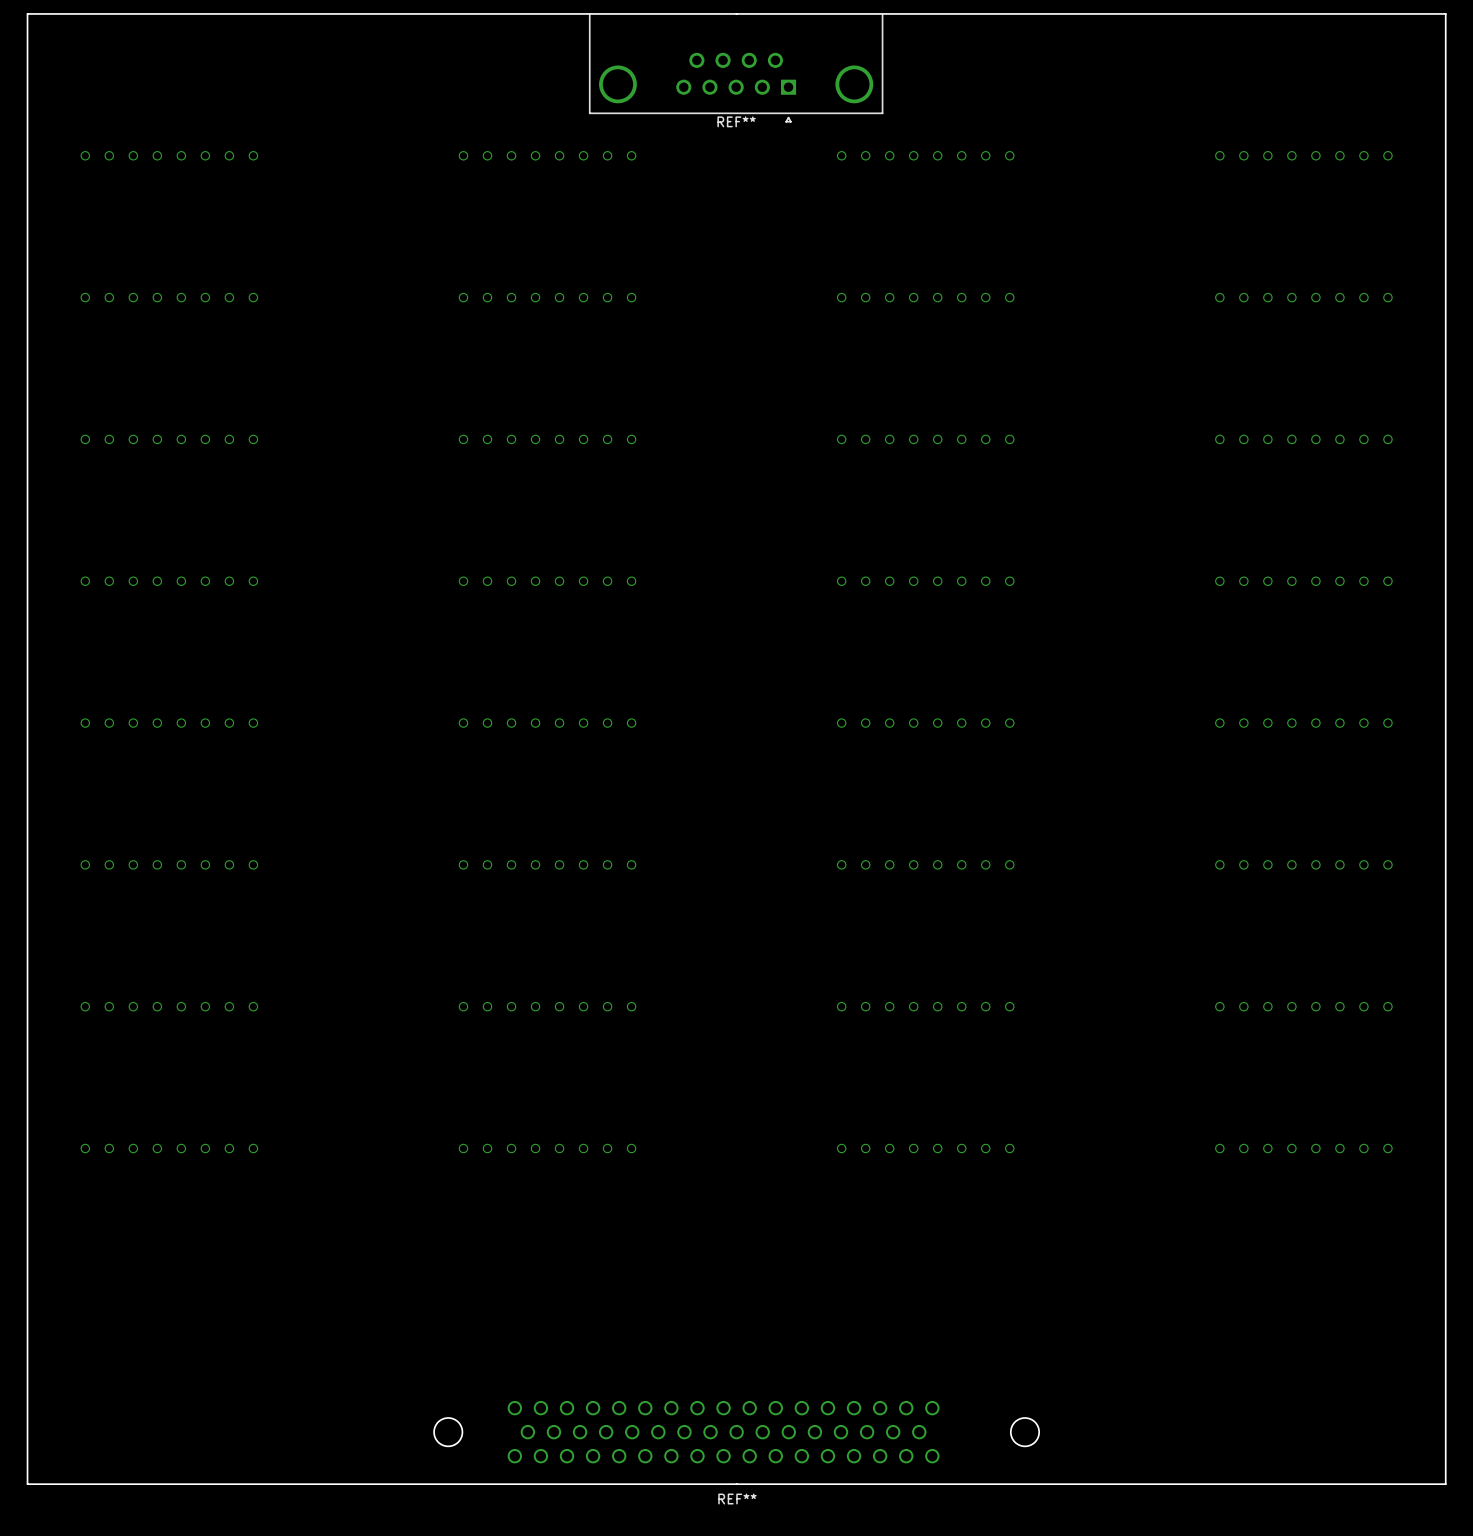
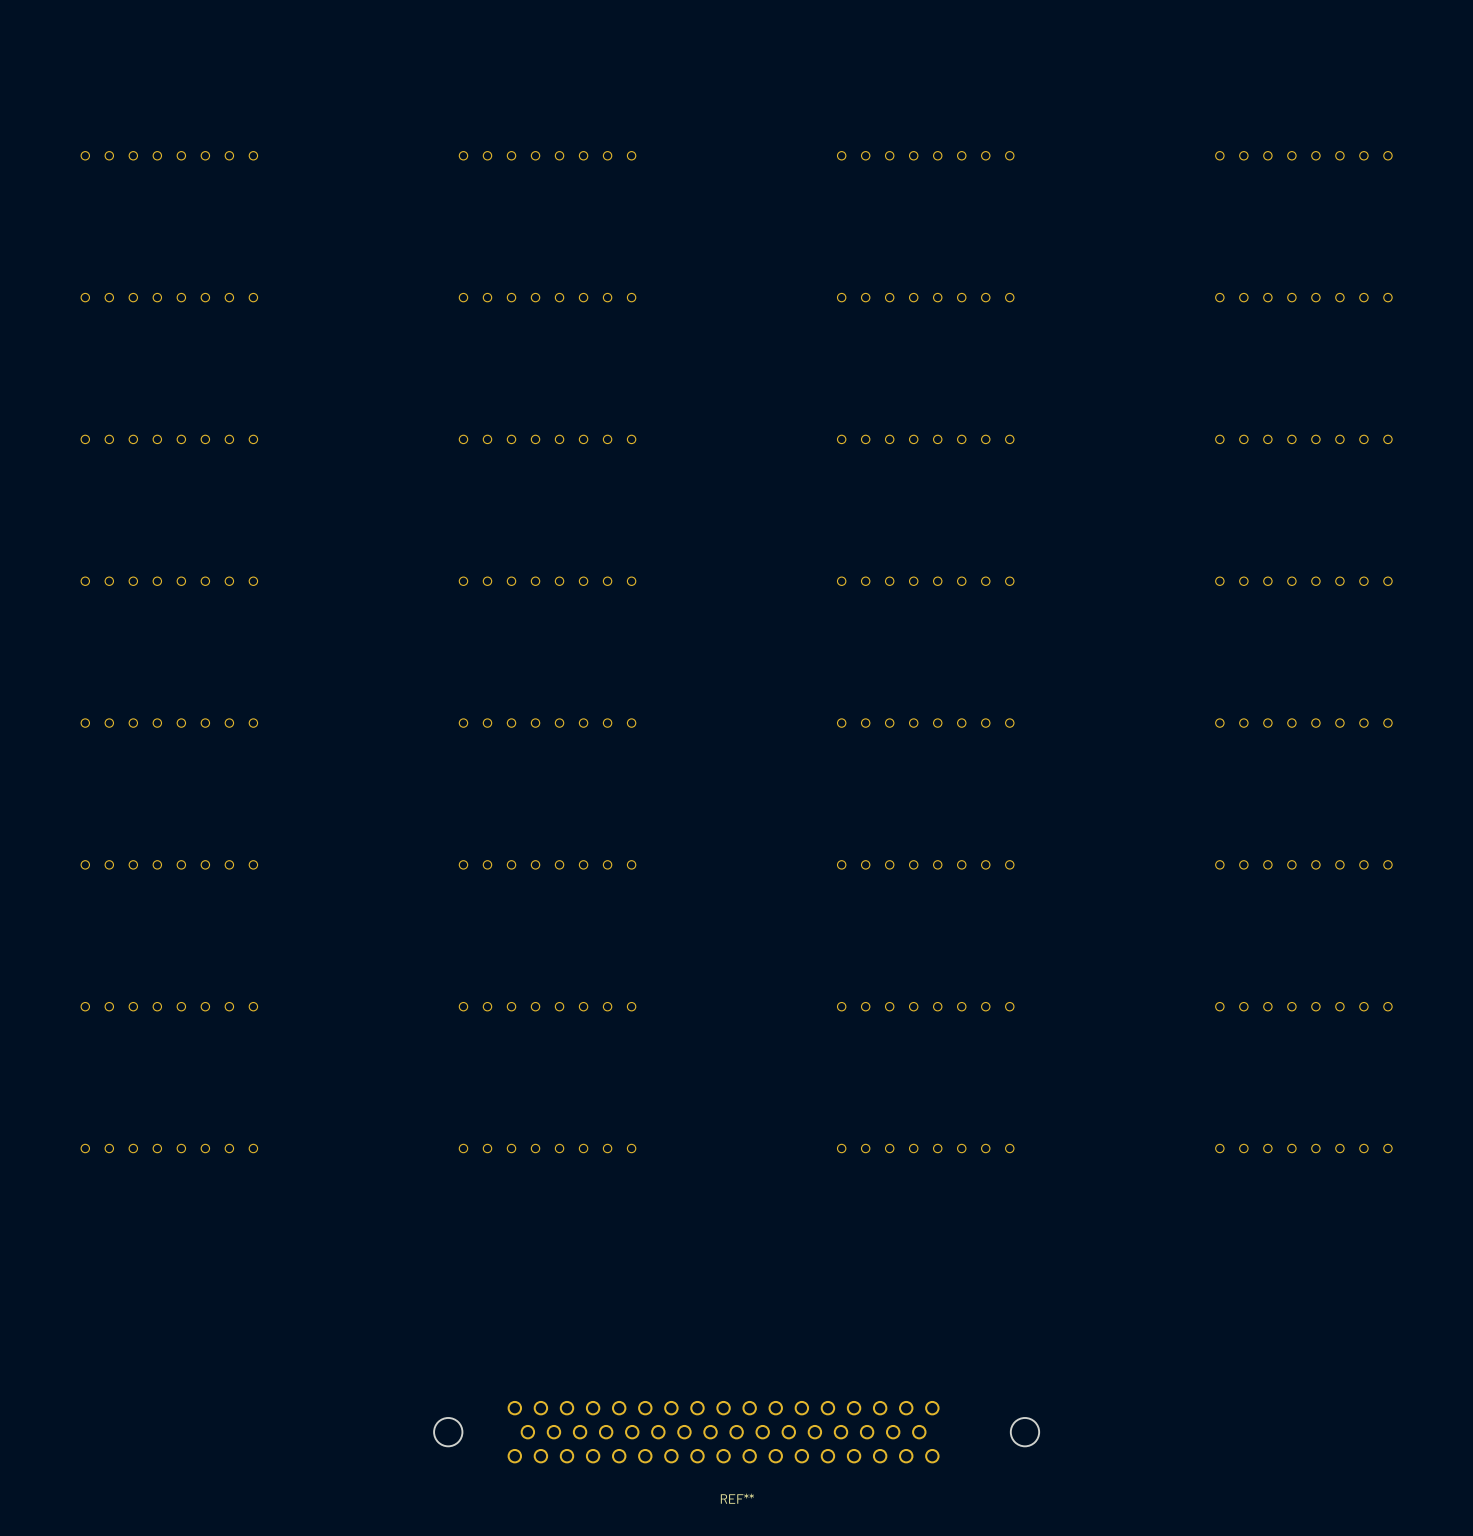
board edge: (27, 13) (1445, 13) (1445, 1484) (27, 1484) (27, 13) -> none
REF**: (736, 68) -> none

